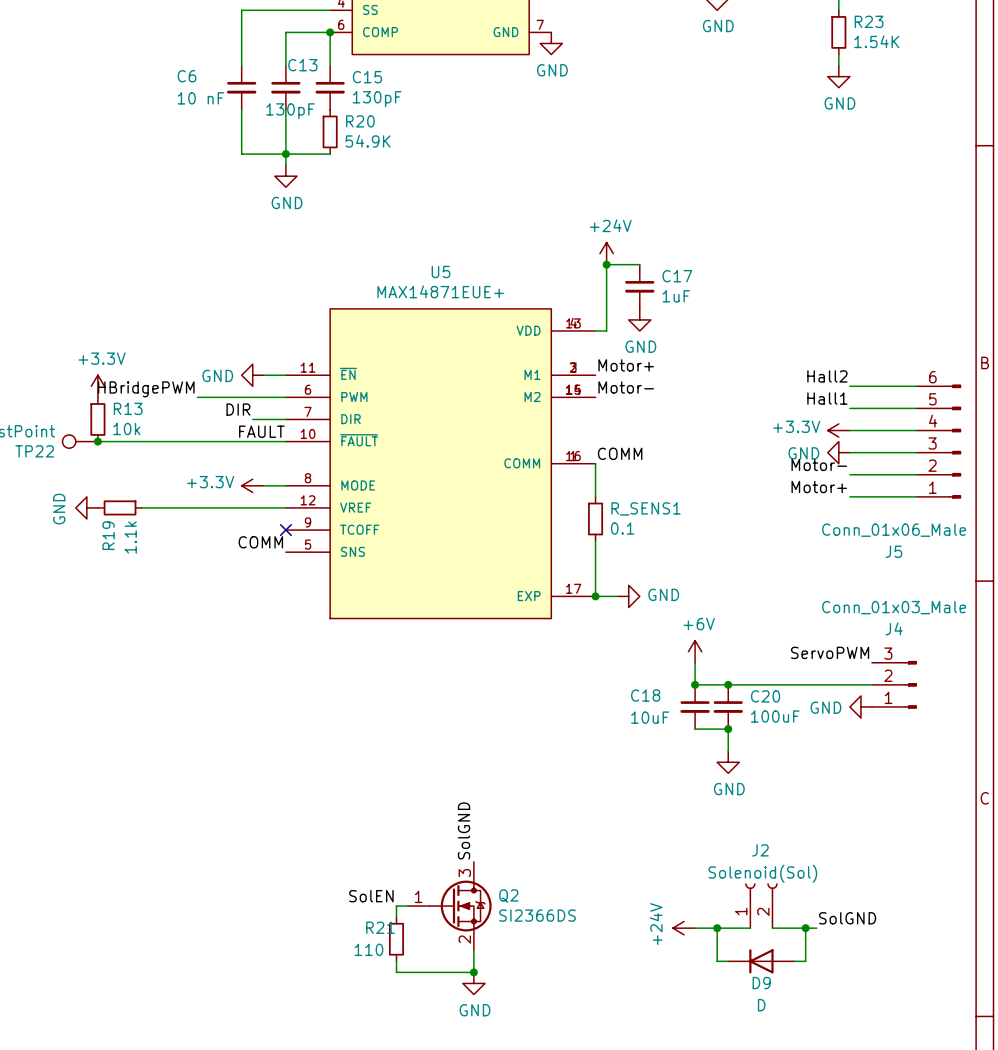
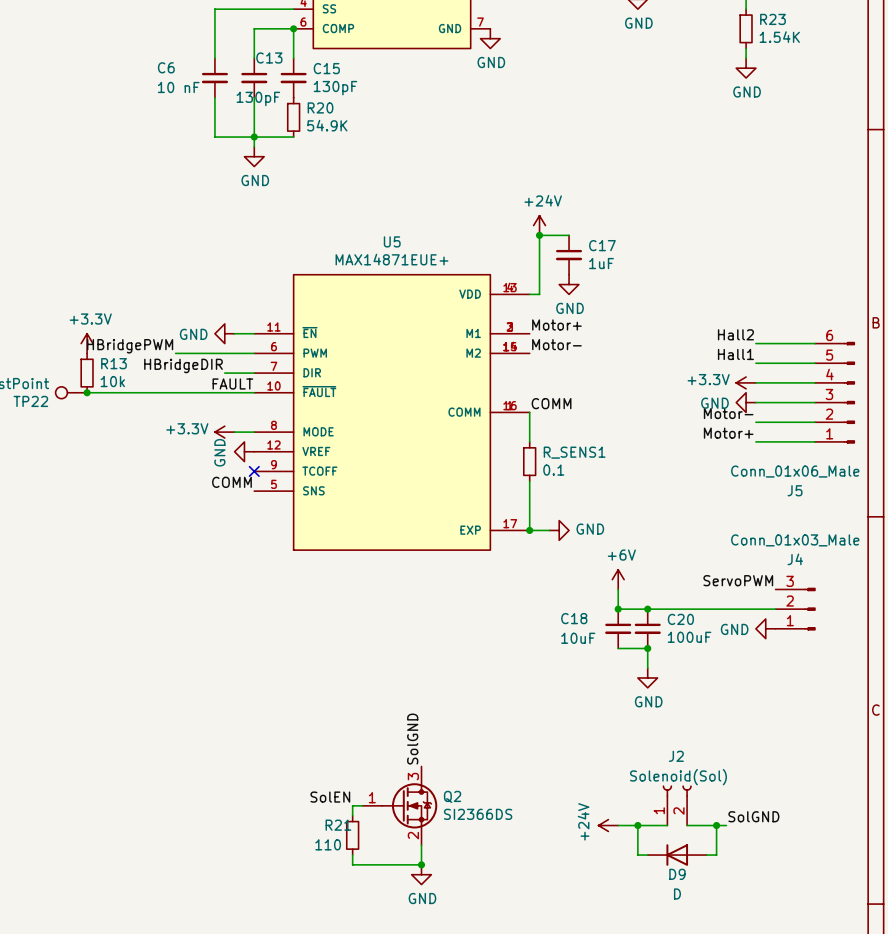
label: DIR (238, 409) -> HBridgeDIR (183, 365)
power symbol position: GND (86, 507) -> GND (244, 451)
R19: 1.1k (120, 507) -> none
wire: (142, 507) (285, 507) -> none

